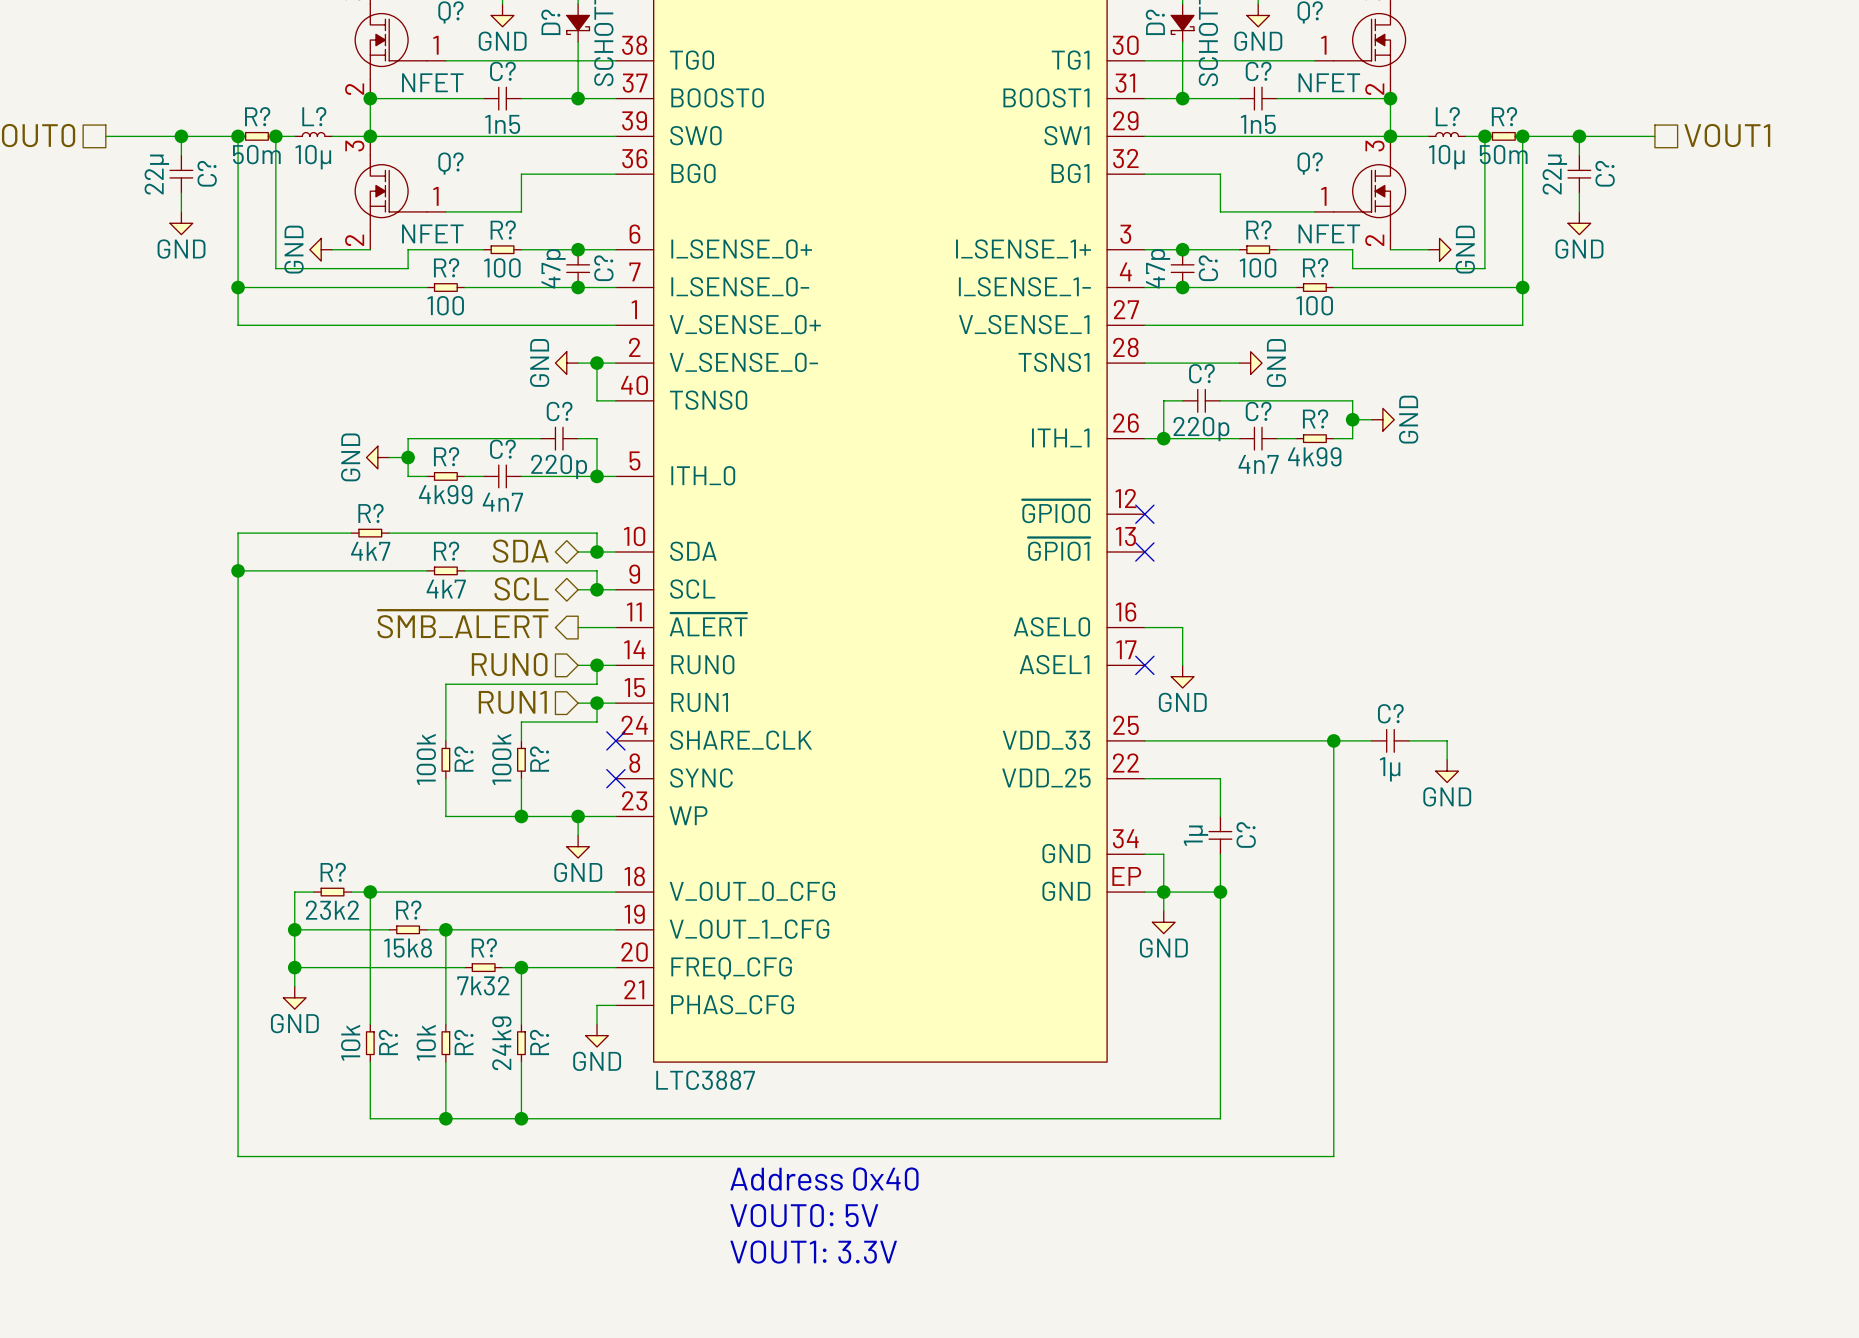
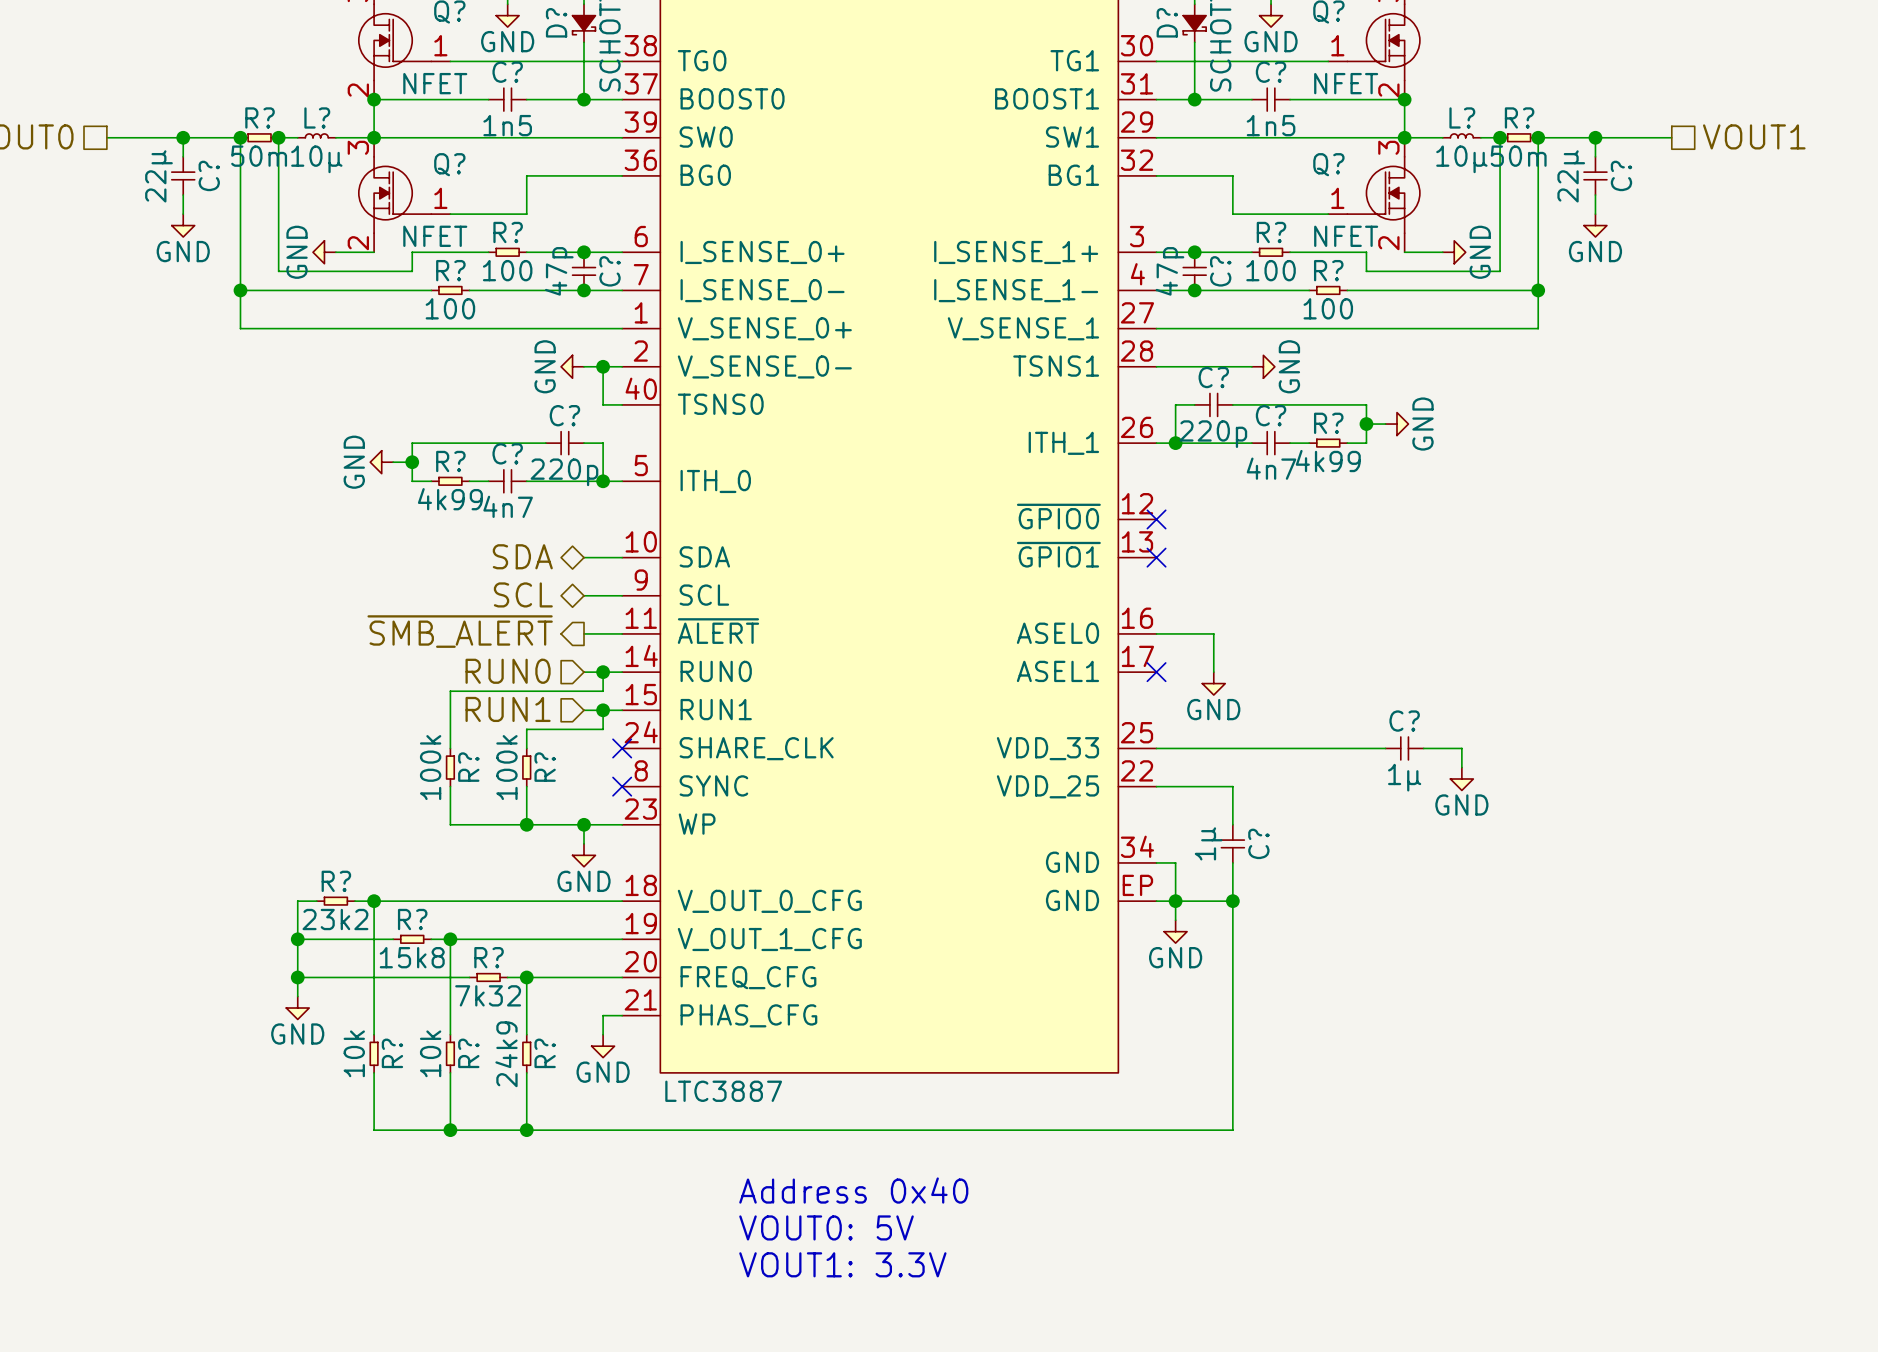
wire: (351, 533) (238, 533) (238, 1156) (1333, 1156) (1333, 740) -> none
R?: 4k7 (370, 533) -> none
wire: (389, 533) (597, 533) (597, 552) -> none
junction: (597, 552) -> none
wire: (238, 570) (426, 570) -> none
junction: (238, 570) -> none
R?: 4k7 (445, 570) -> none
wire: (464, 570) (597, 570) (597, 589) -> none
junction: (597, 589) -> none
wire: (1182, 627) (1182, 665) -> (1194, 633) (1213, 633) (1213, 672)
power symbol position: GND (1182, 676) -> GND (1213, 683)
junction: (1333, 740) -> none

